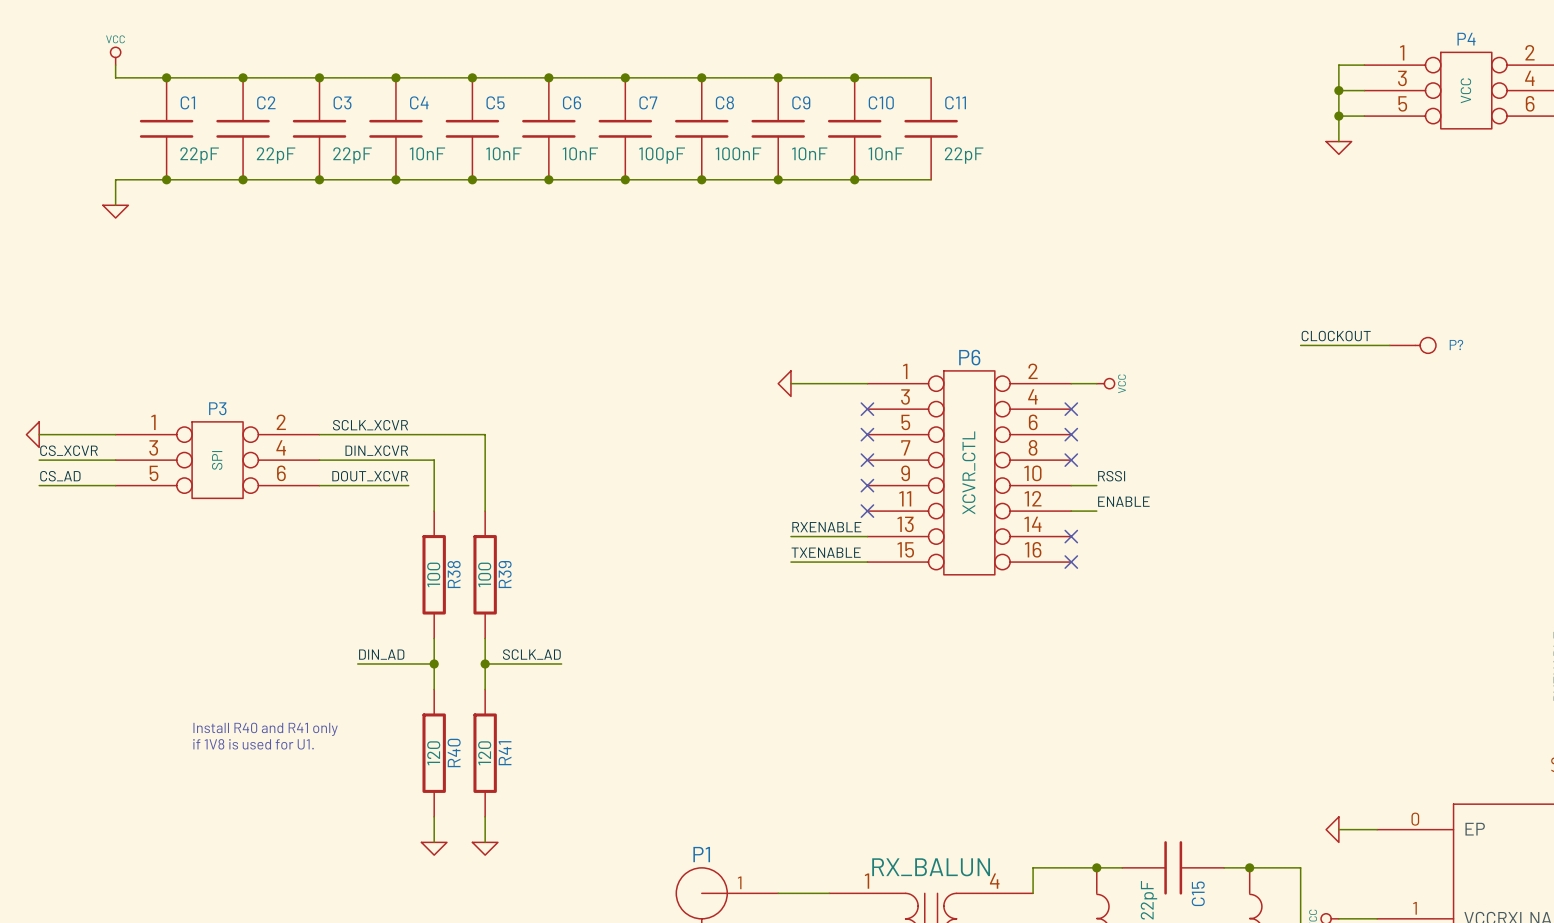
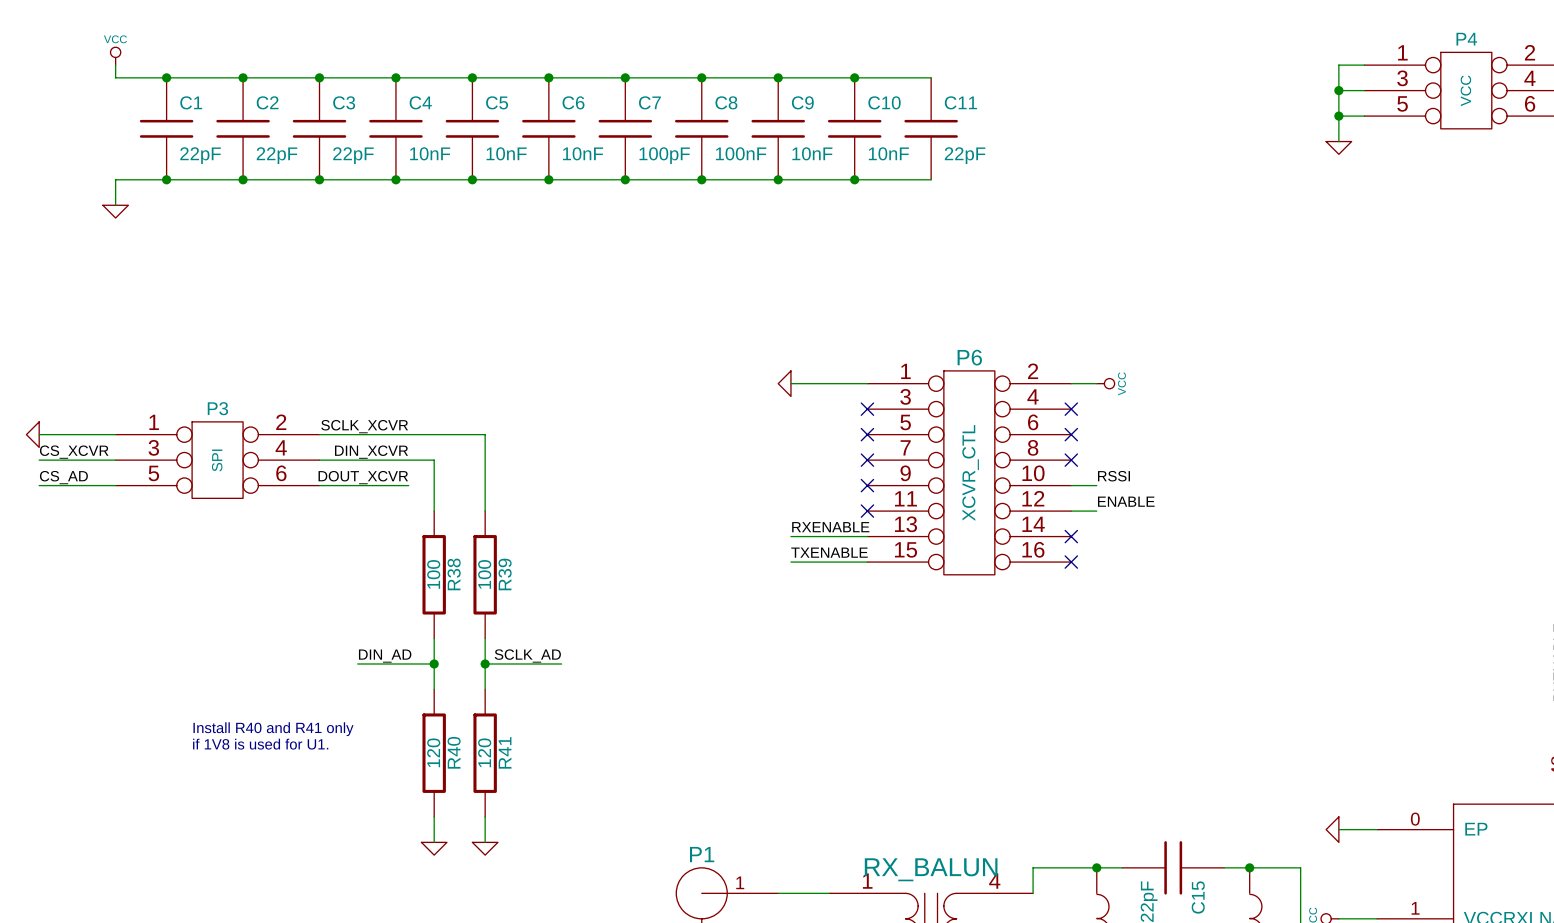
label: CLOCKOUT (1336, 336) -> none
wire: (1300, 345) (1389, 345) -> none
P?: (1412, 345) -> none

